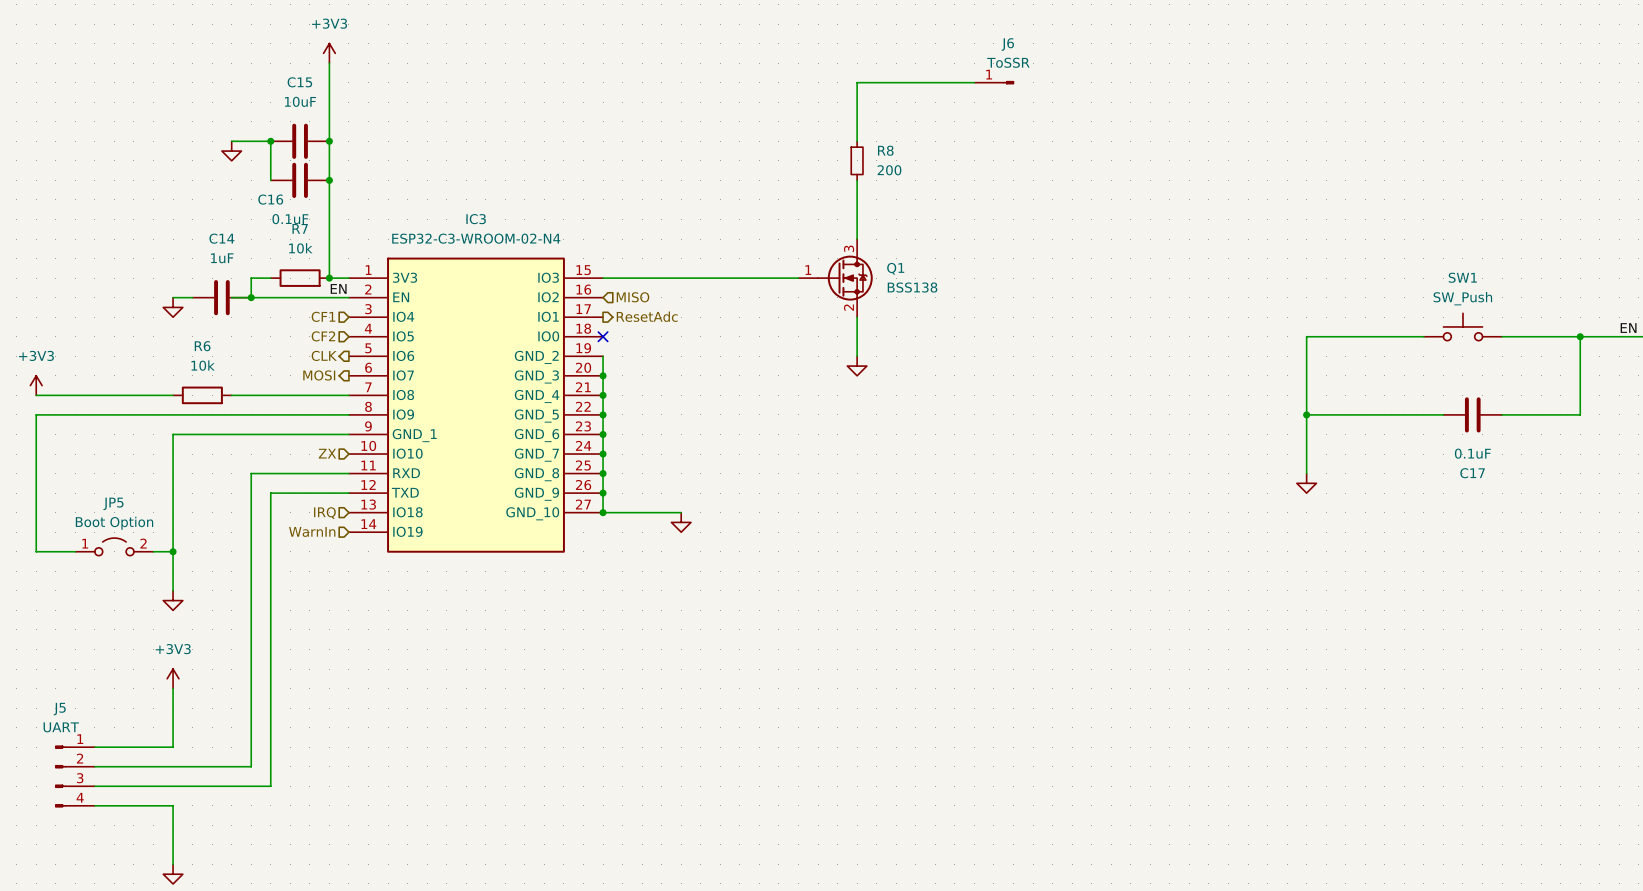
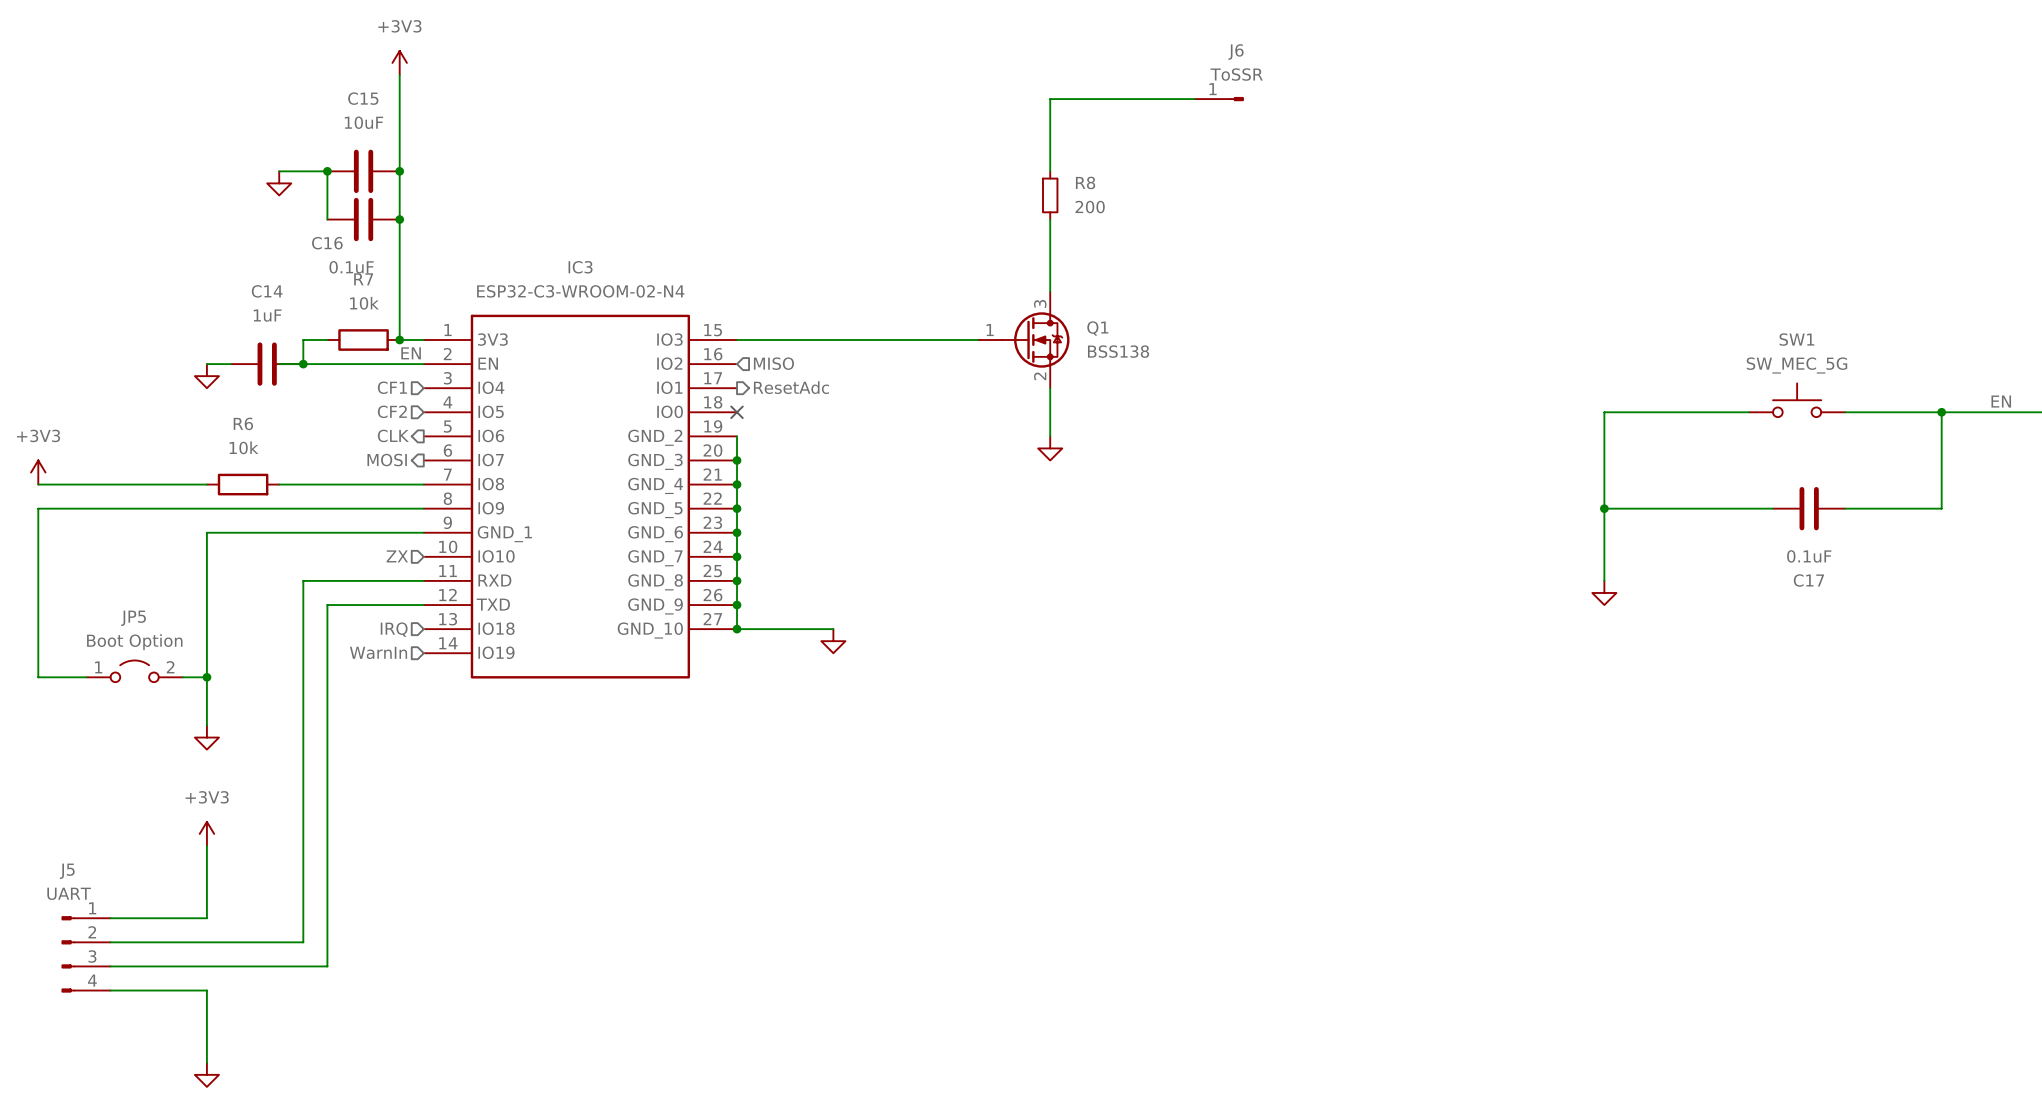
SW1 value: SW_Push (1462, 298) -> SW_MEC_5G (1796, 365)

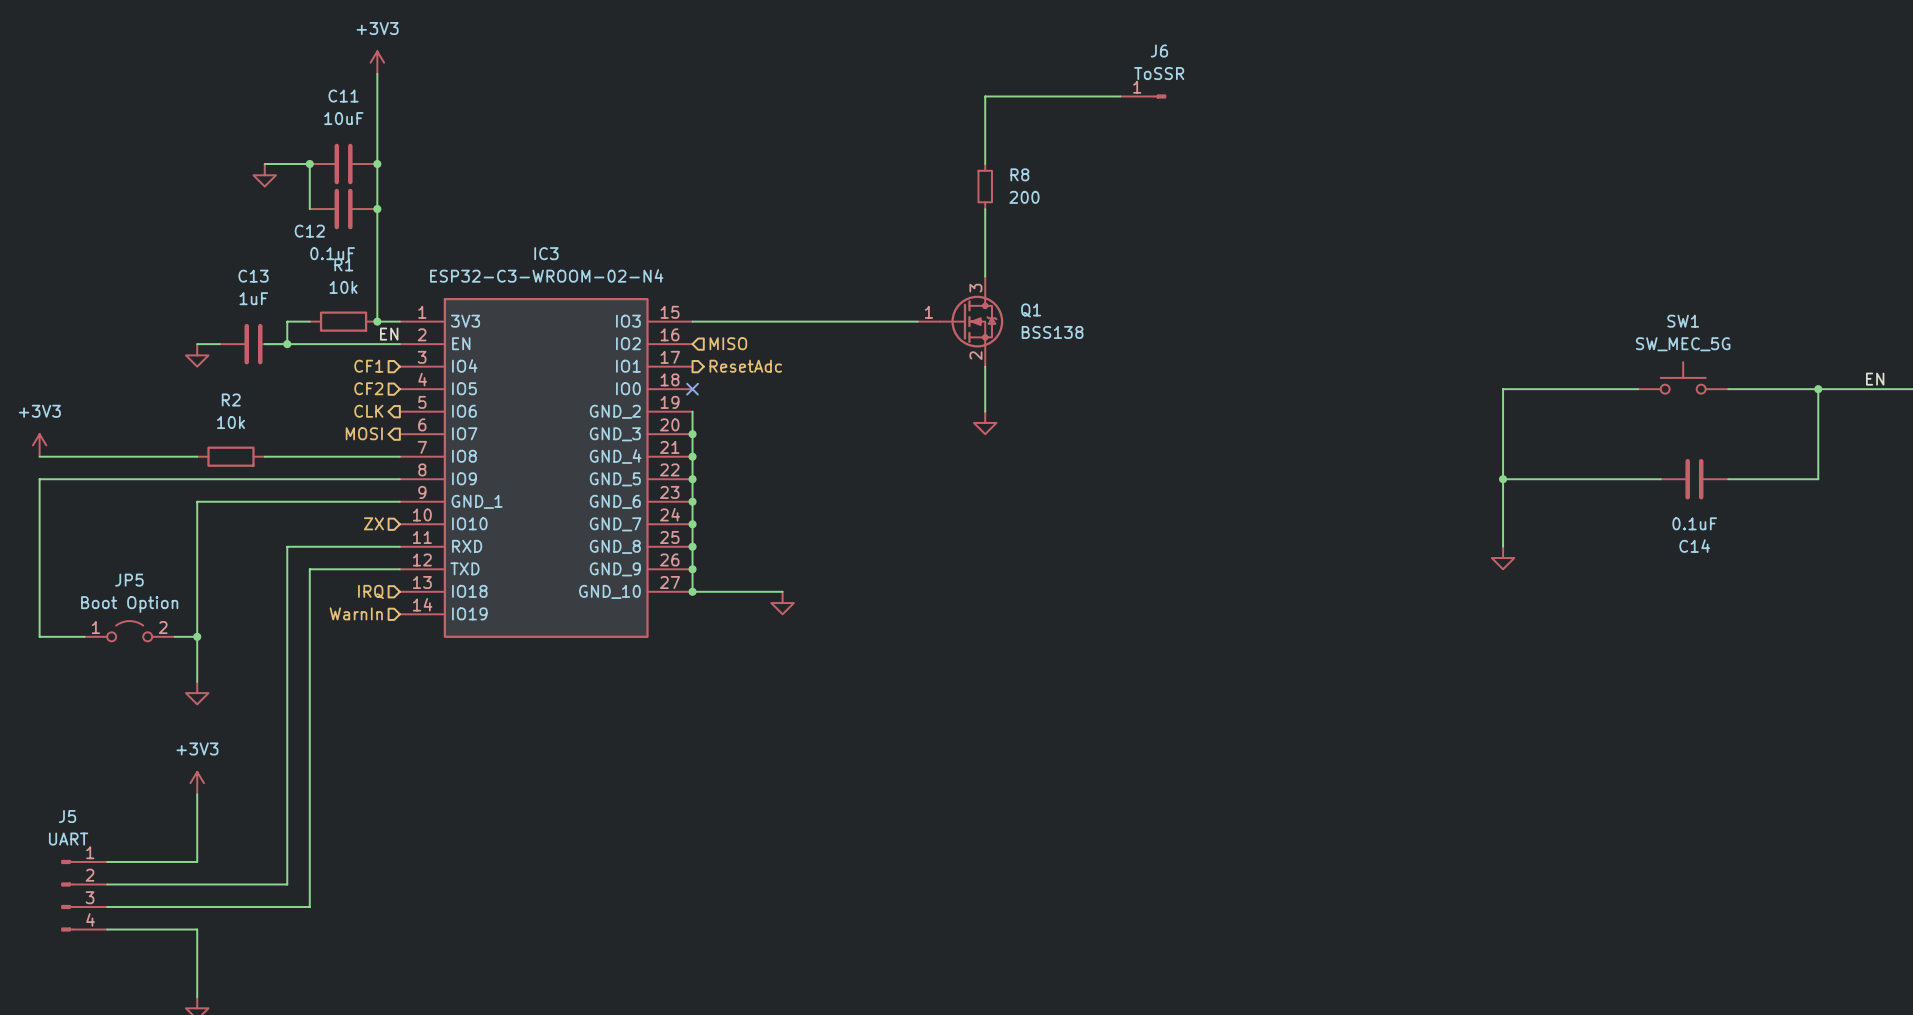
C15 name: C15 (363, 98) -> C11 (343, 96)
C16 name: C16 (327, 243) -> C12 (309, 231)
R7 name: R7 (363, 279) -> R1 (343, 264)
C14 name: C14 (267, 291) -> C13 (253, 276)
R6 name: R6 (243, 423) -> R2 (231, 400)
C17 name: C17 (1808, 580) -> C14 (1694, 546)

